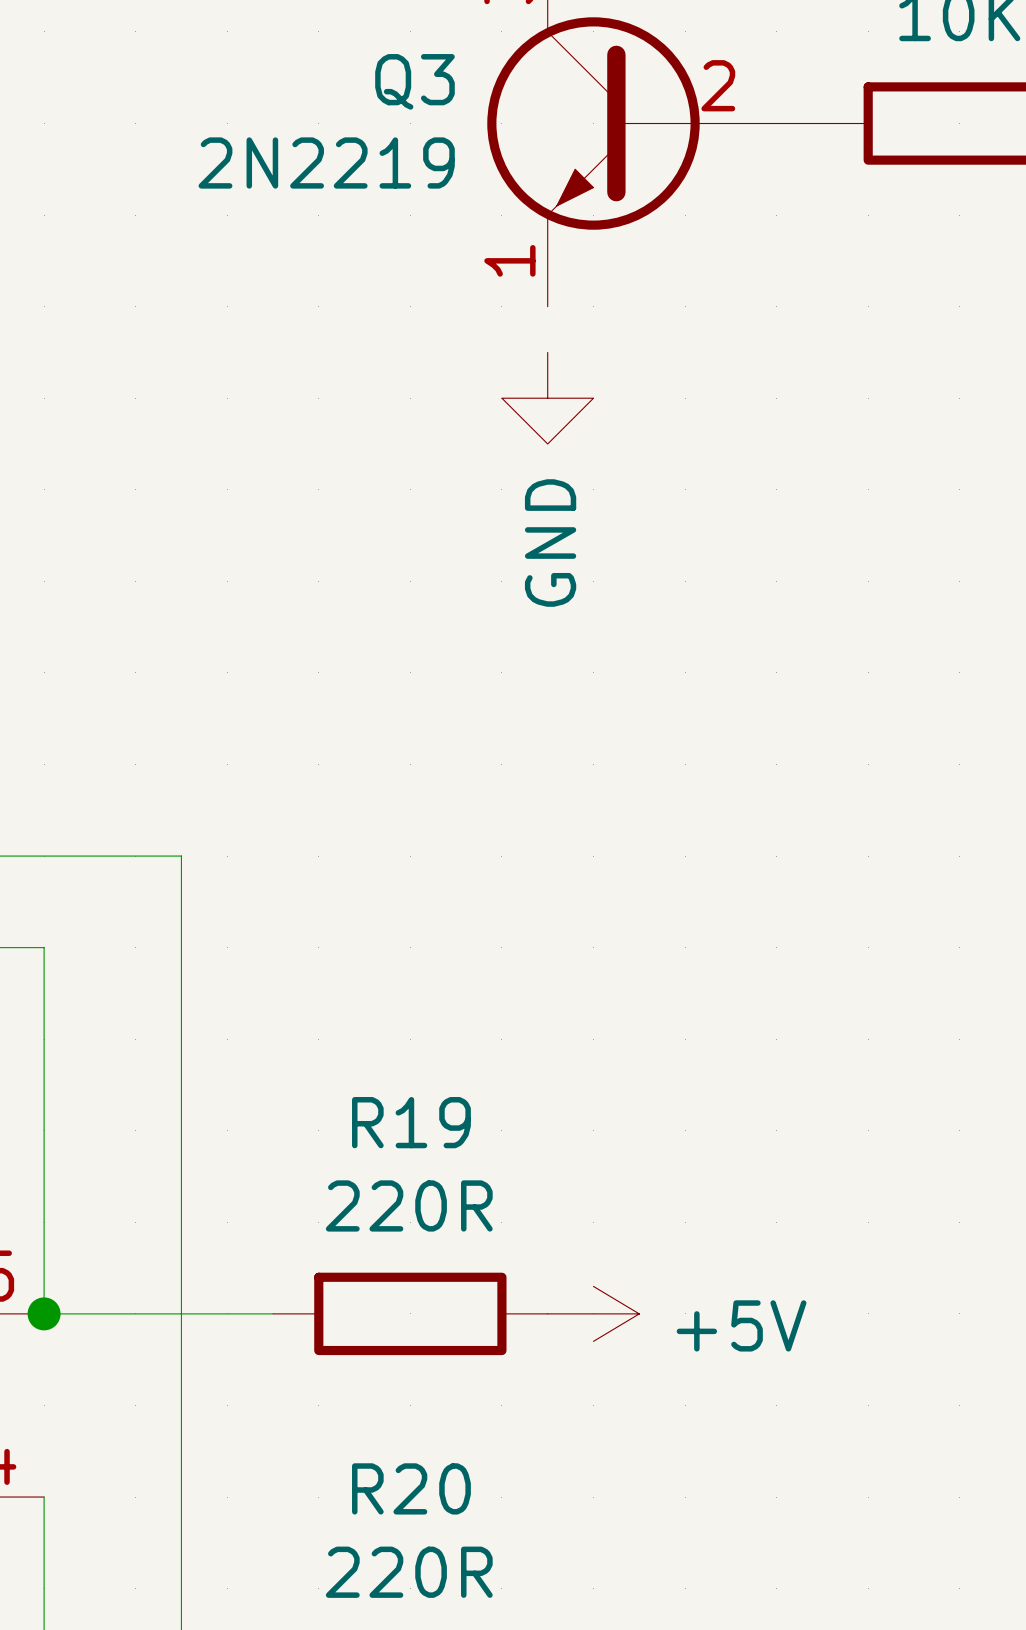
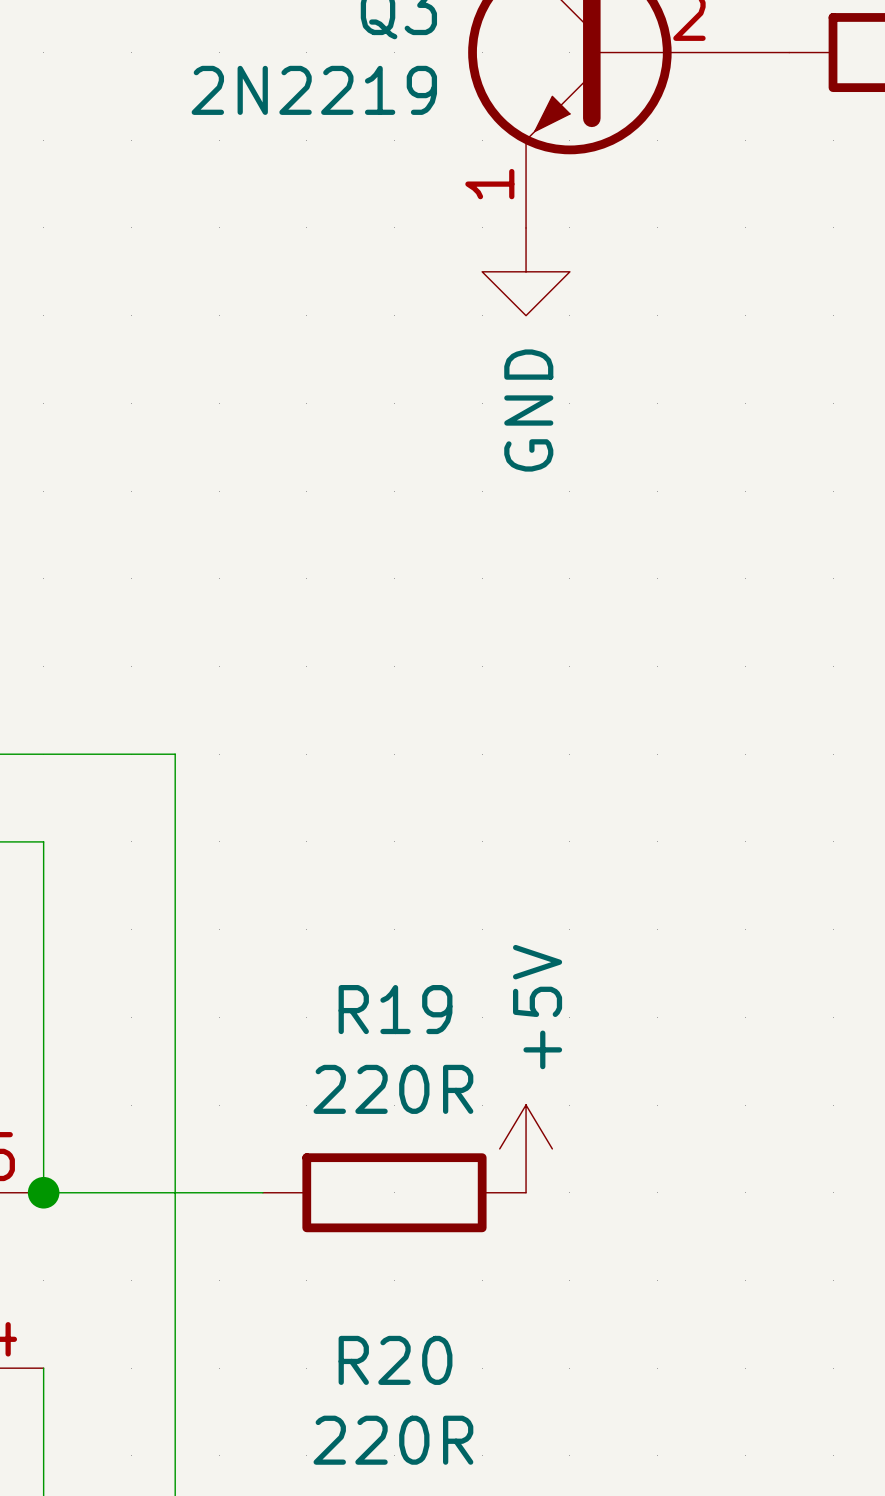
power symbol position: GND (547, 398) -> GND (526, 271)
power symbol rotation: 0° (593, 1313) -> 90° counterclockwise (526, 1148)
power symbol position: +5V (593, 1313) -> +5V (526, 1148)

